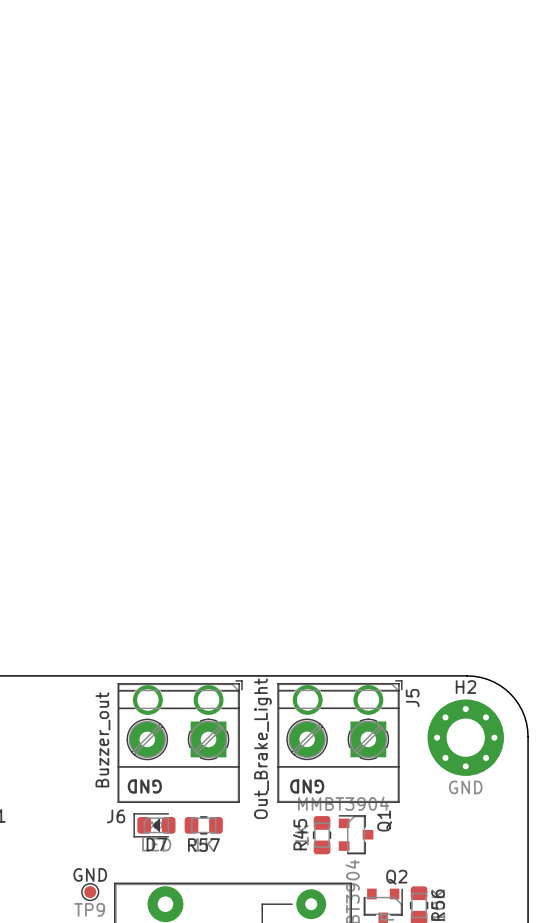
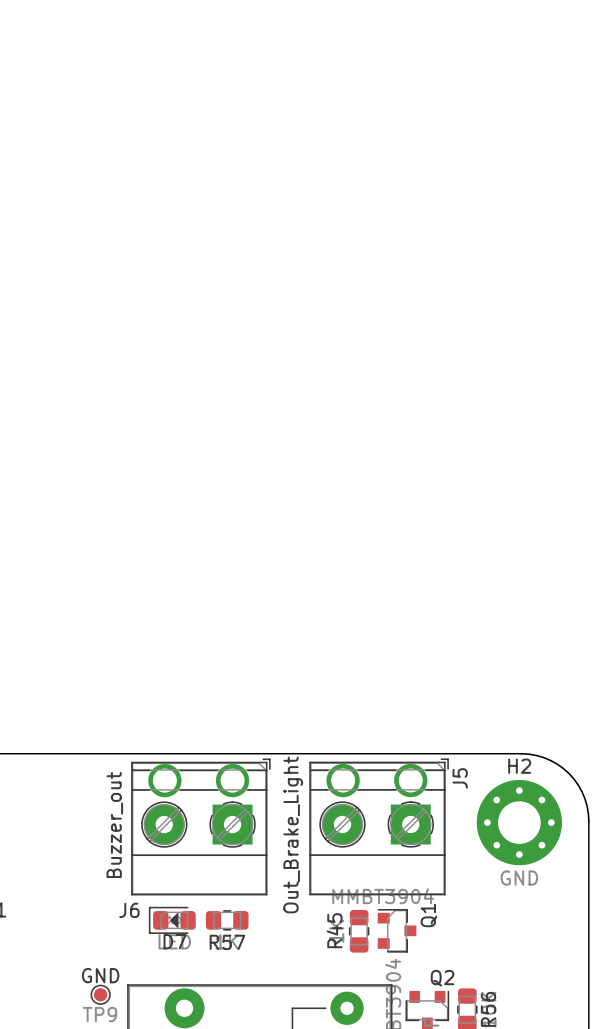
text: GND (144, 786) -> none
text: GND (307, 786) -> none

